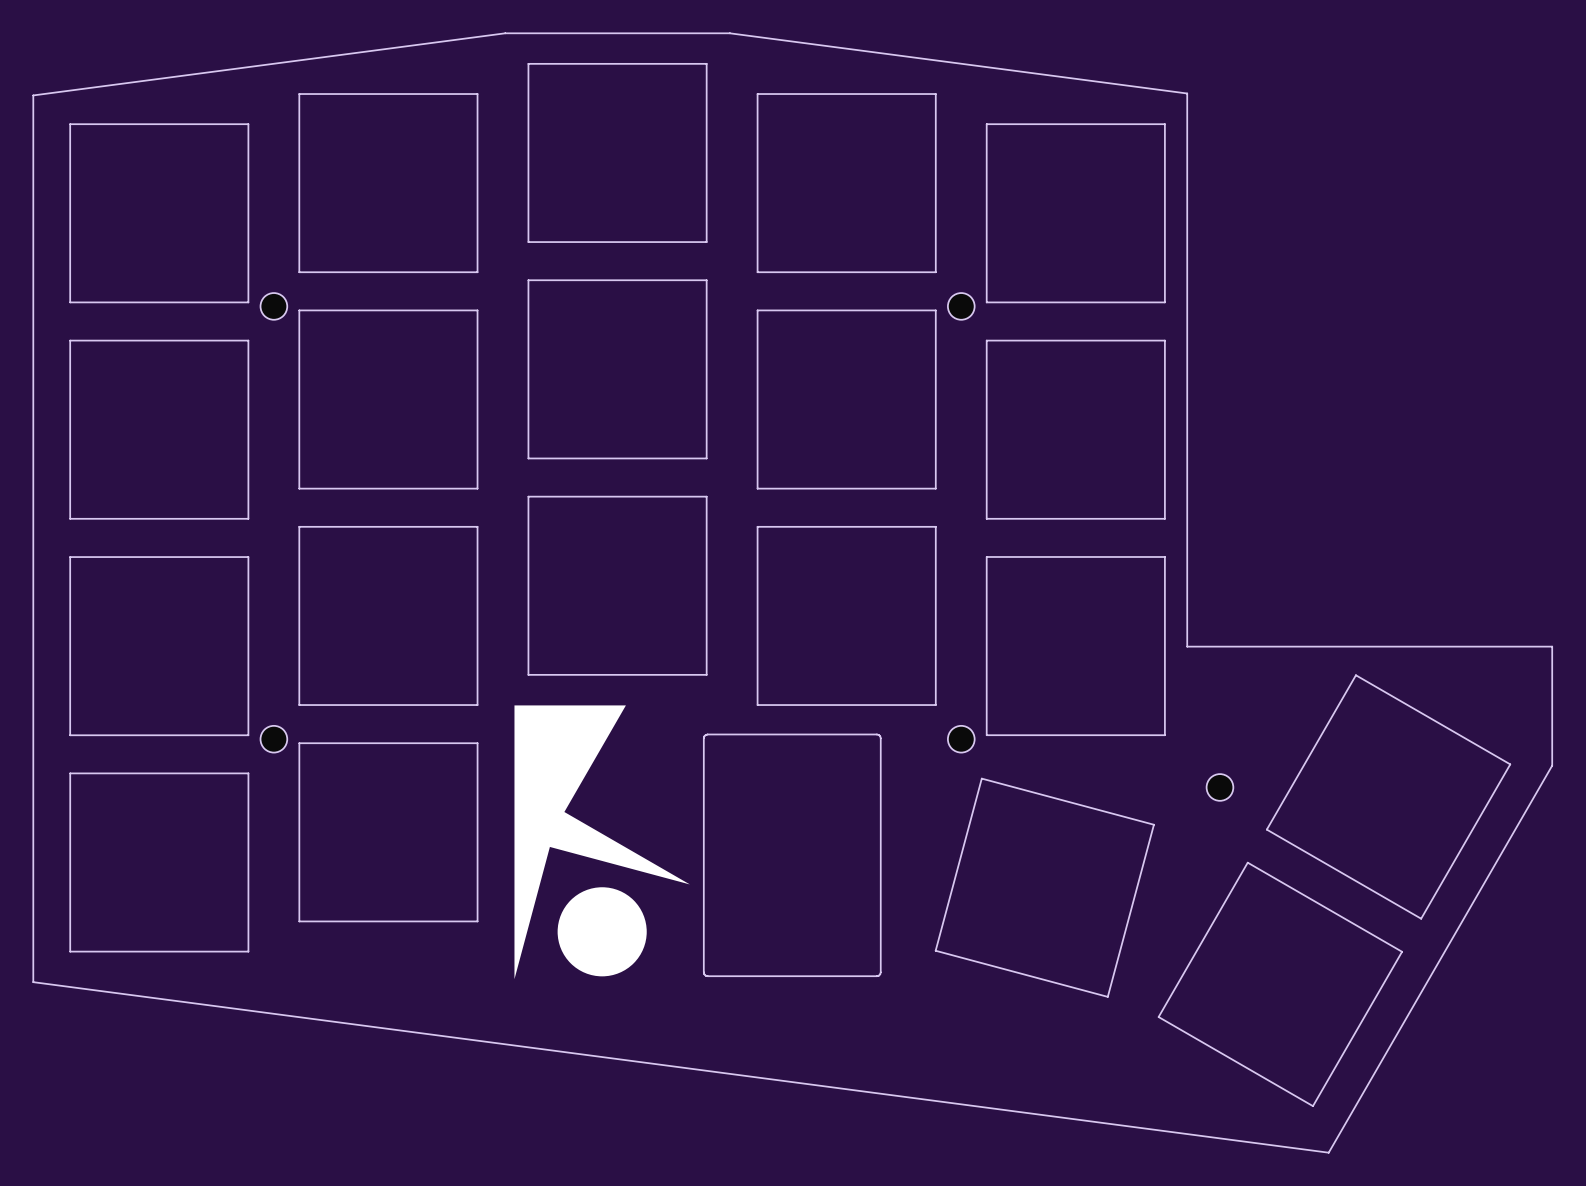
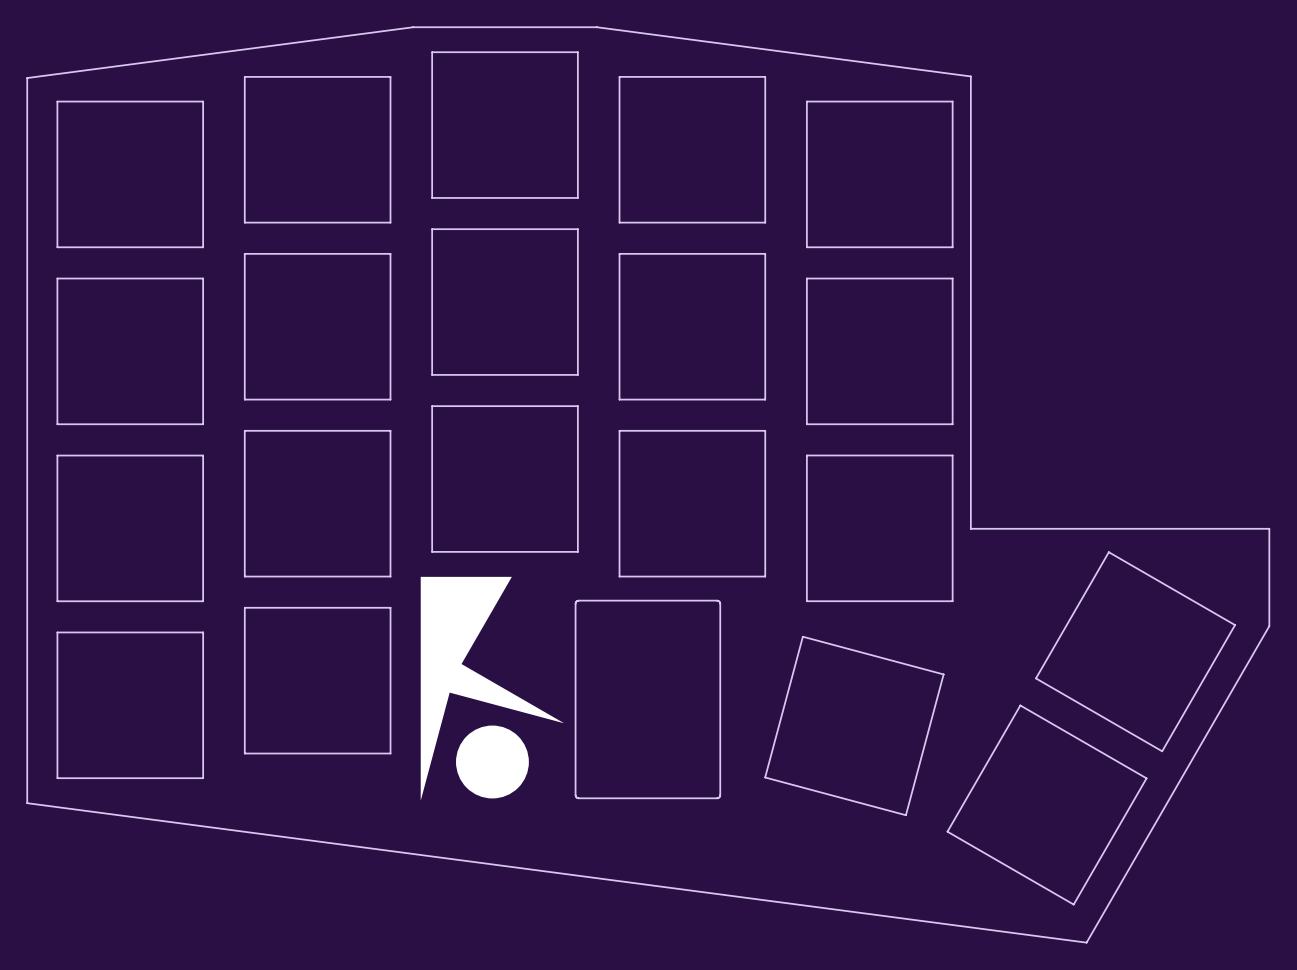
part: (273, 306) -> none
part: (961, 306) -> none
part: (273, 739) -> none
part: (961, 739) -> none
part: (1219, 787) -> none

